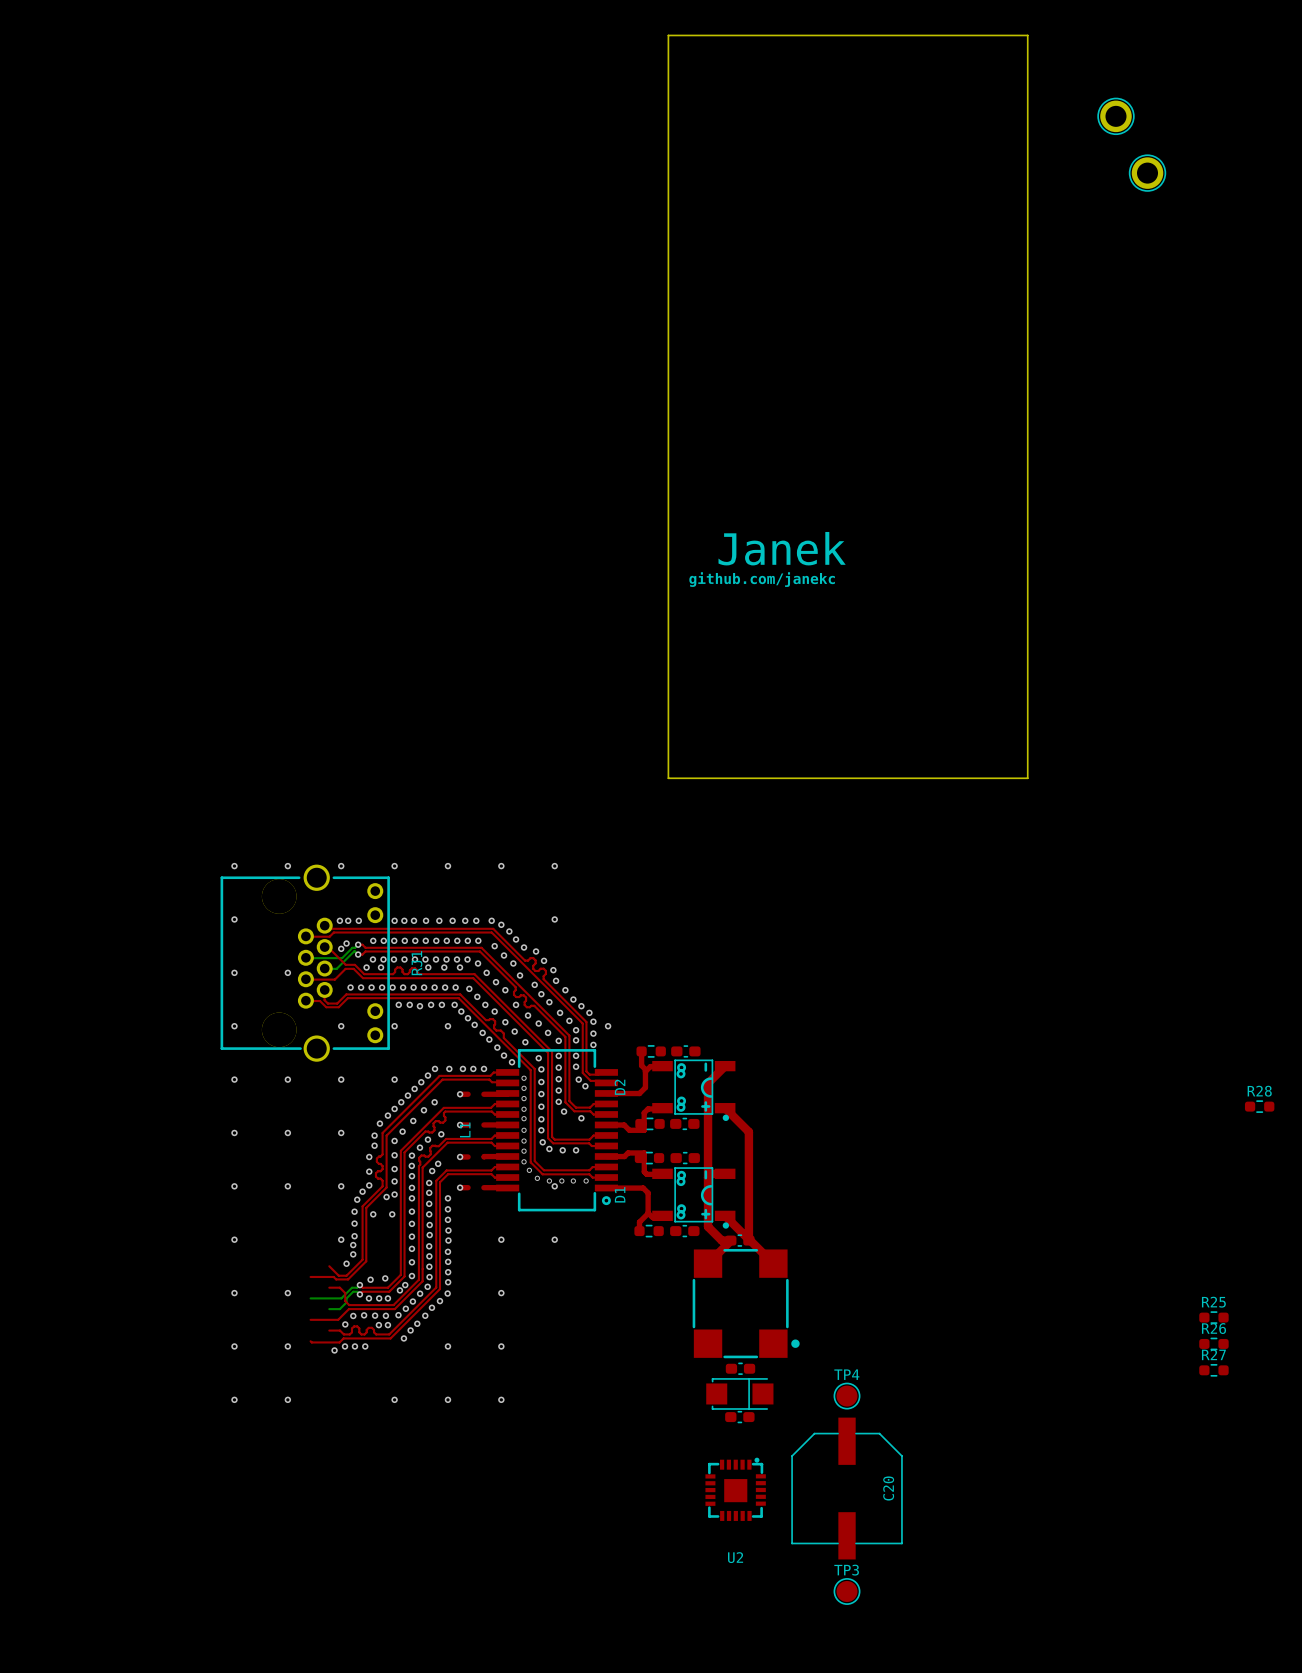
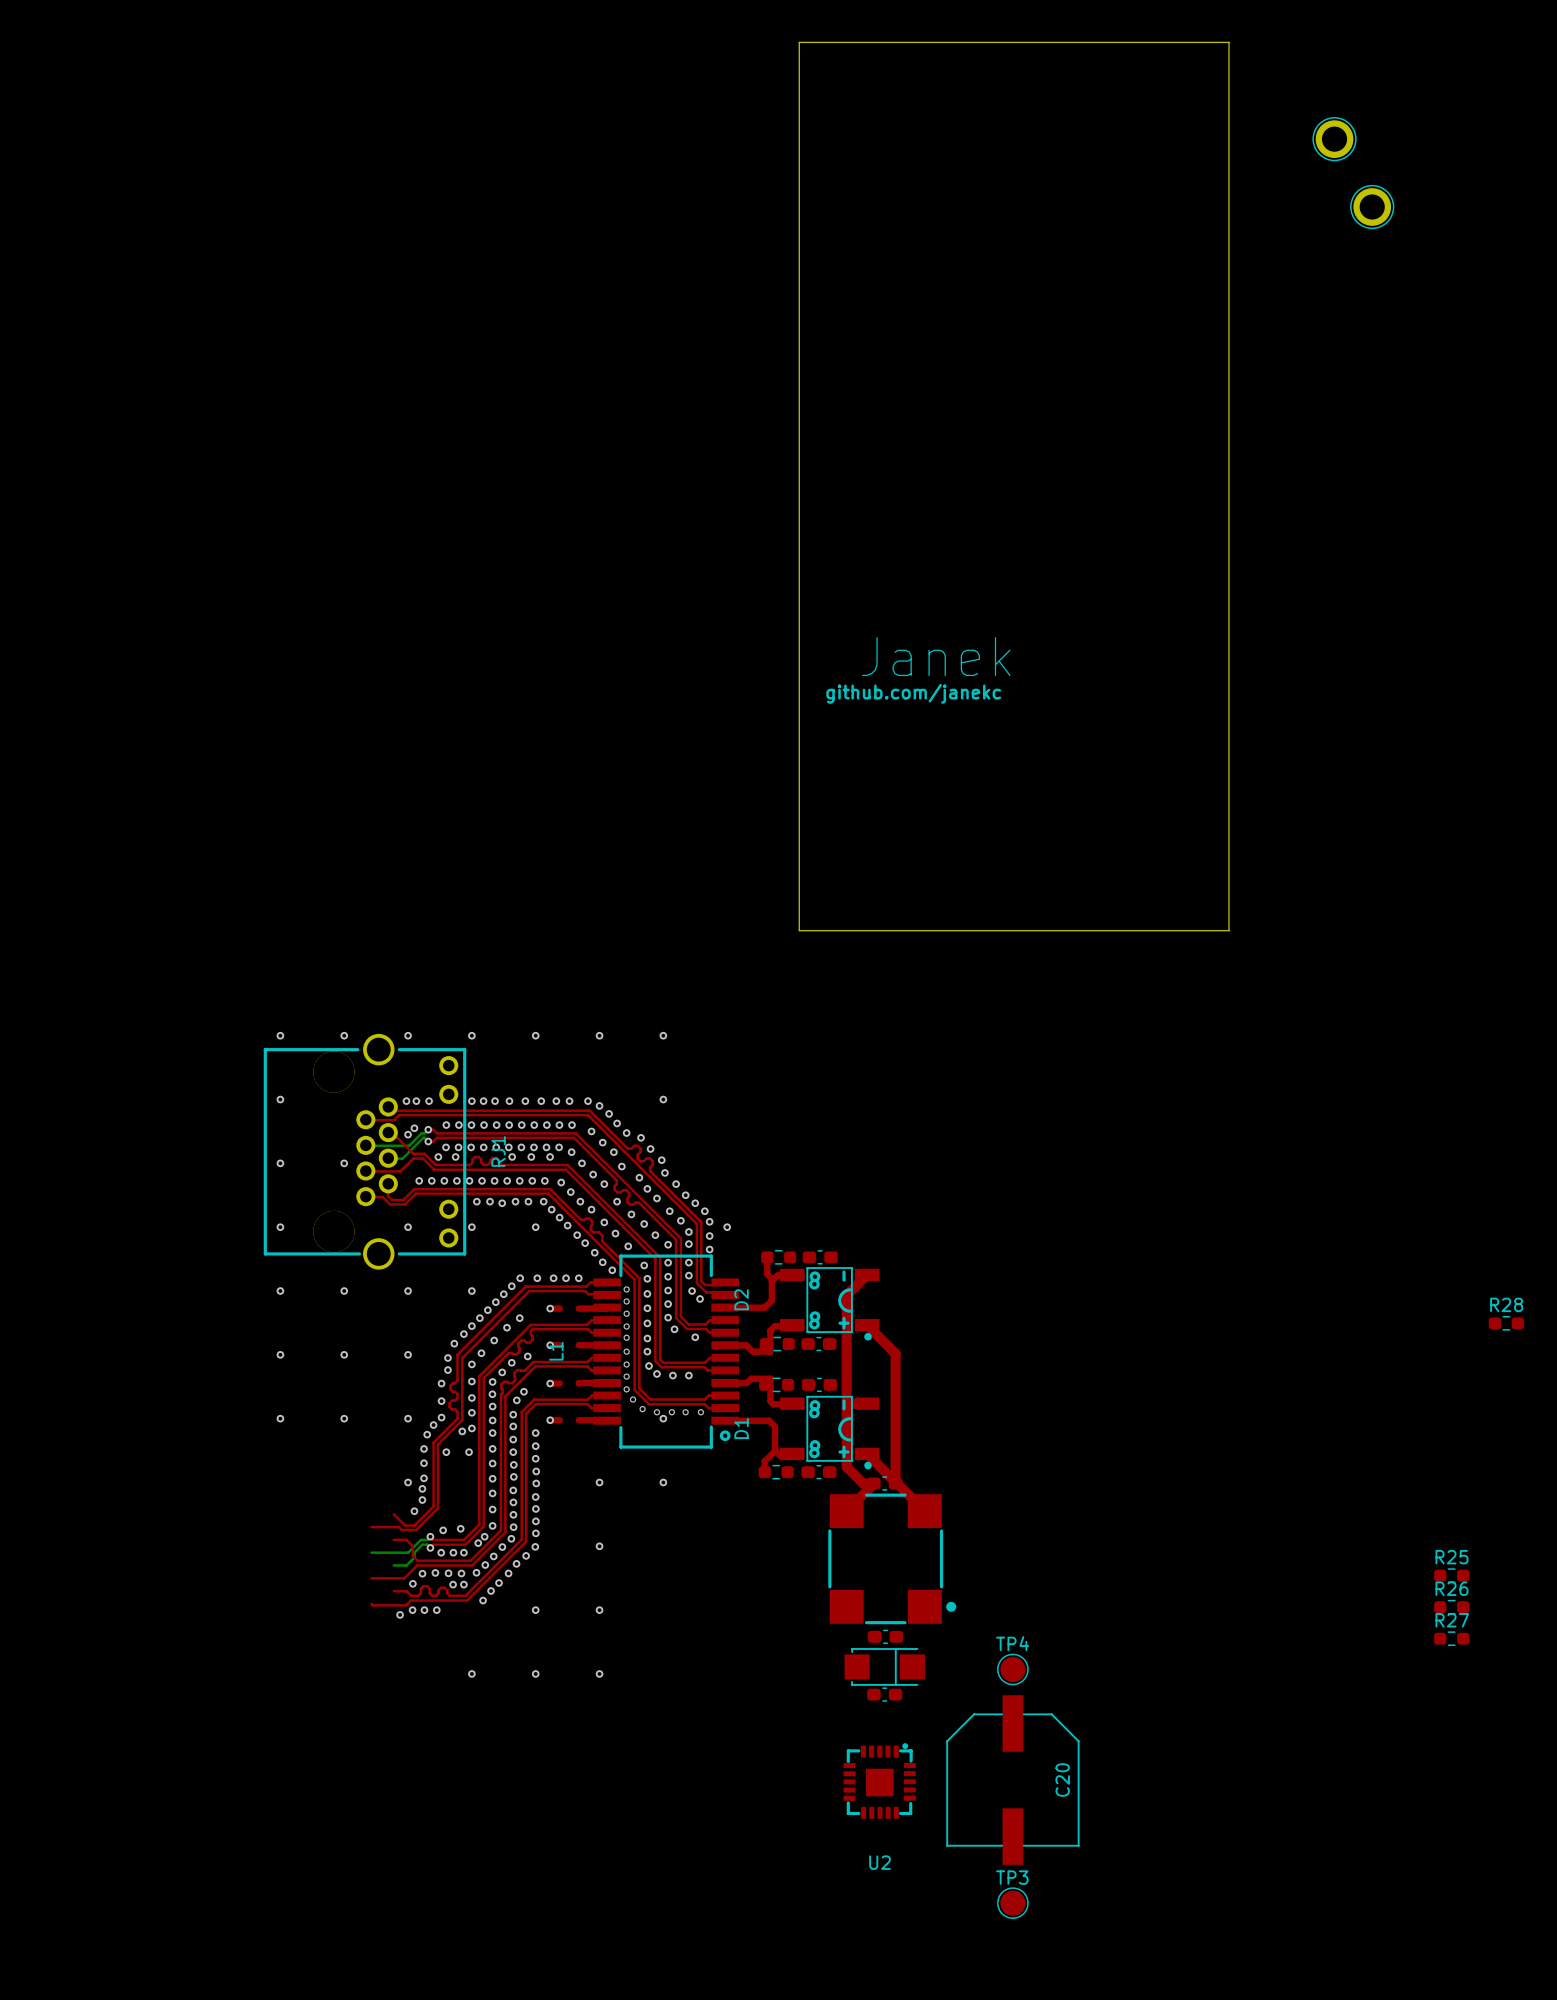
via: (234, 1239) -> none
via: (234, 1293) -> none
via: (287, 1293) -> none
via: (234, 1346) -> none
via: (287, 1346) -> none
via: (234, 1399) -> none
via: (287, 1399) -> none

